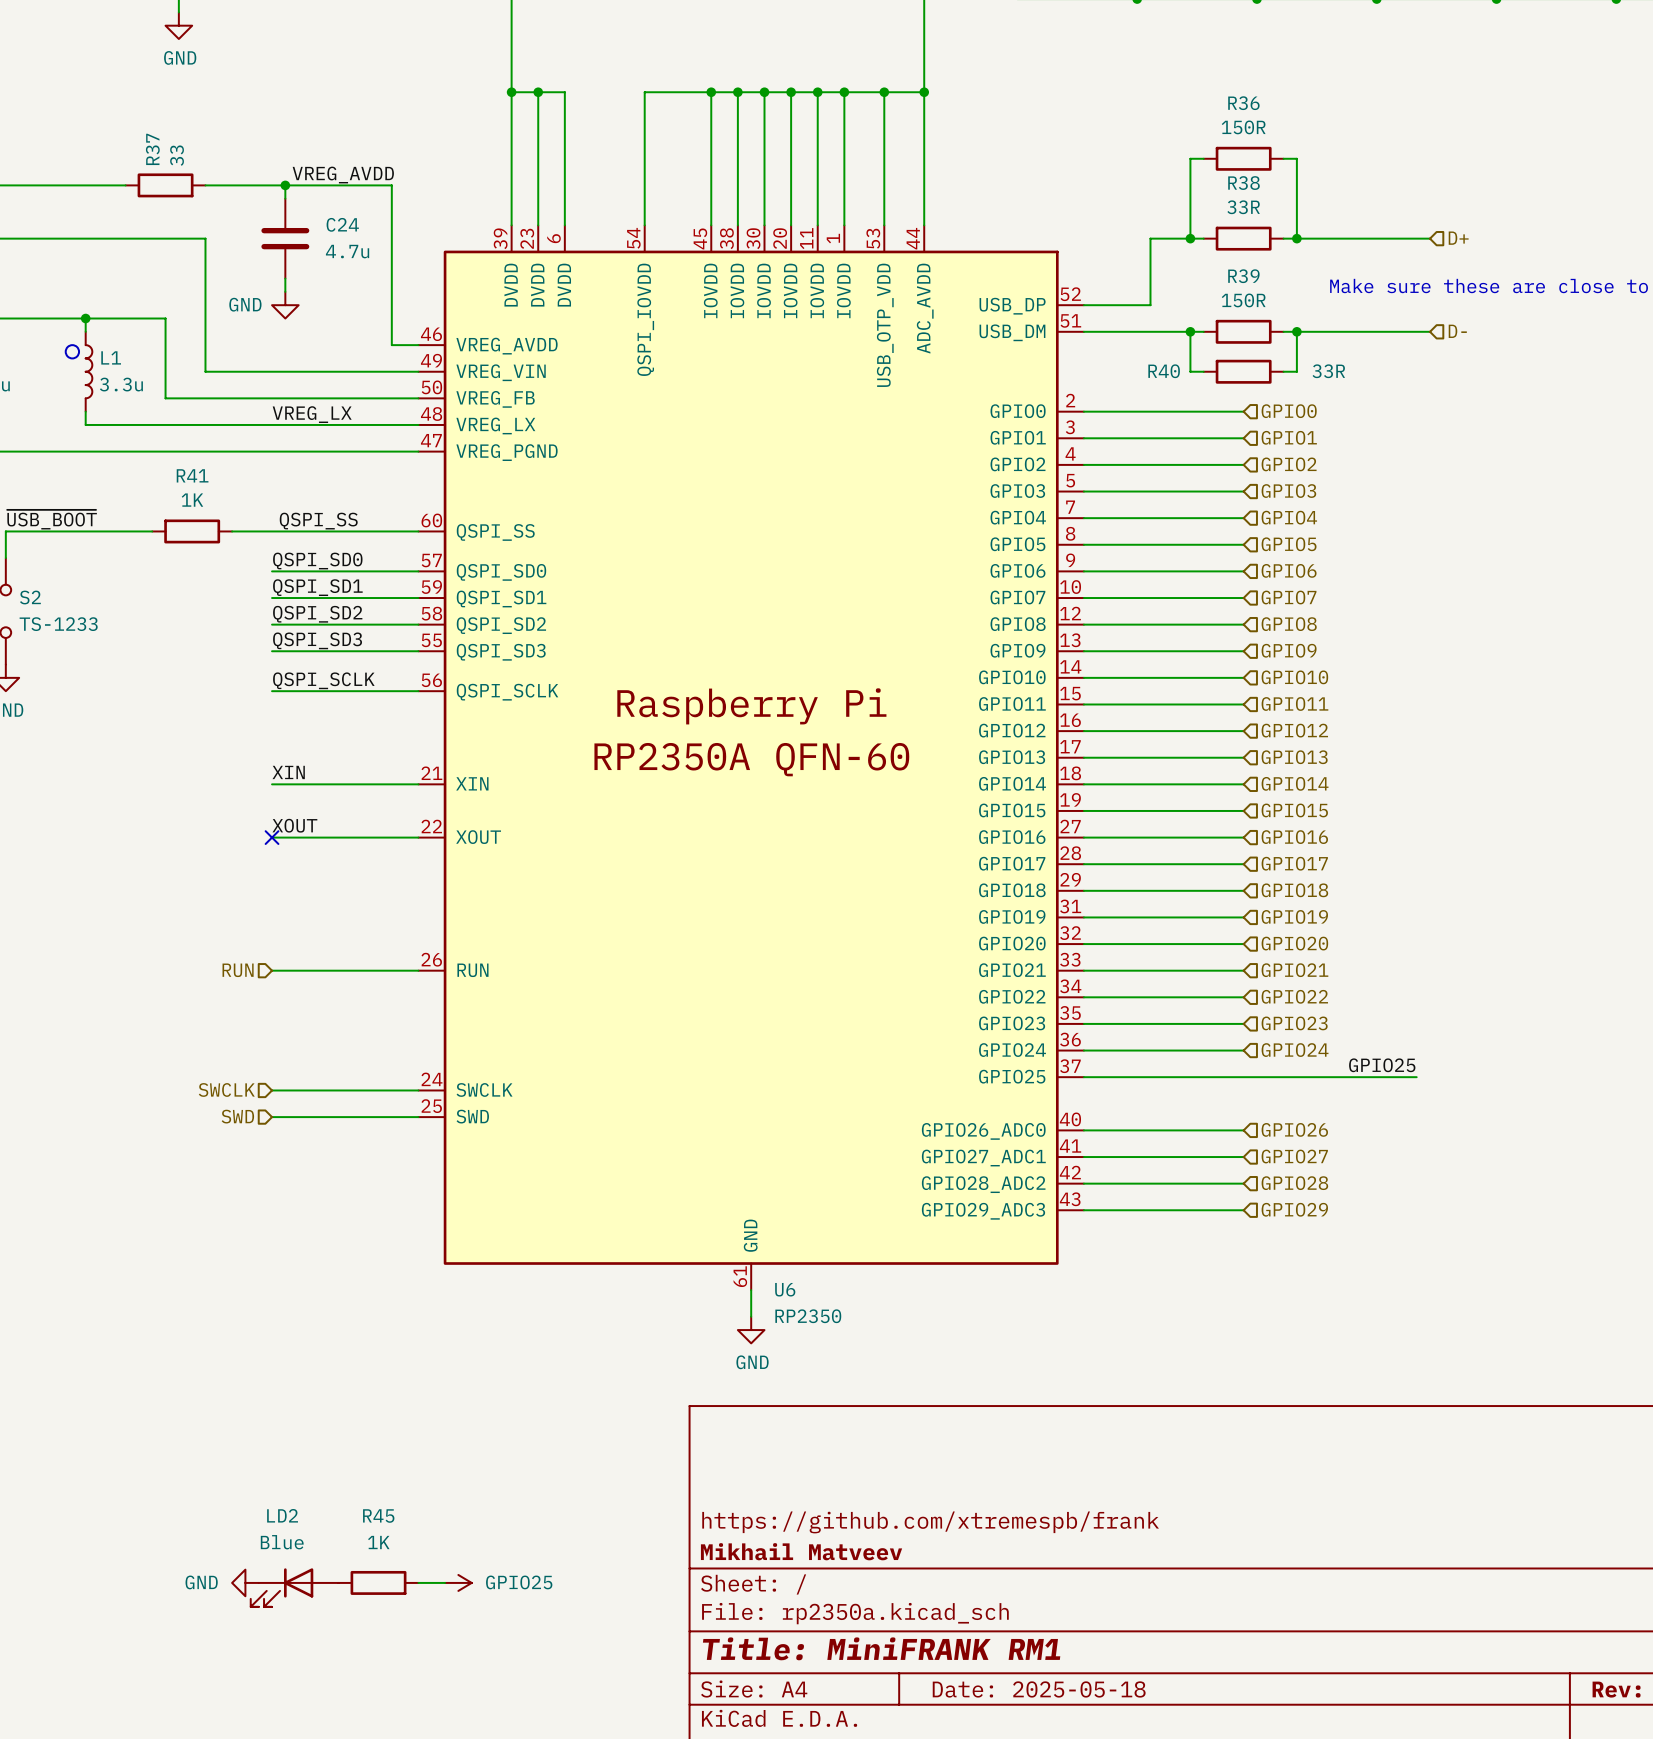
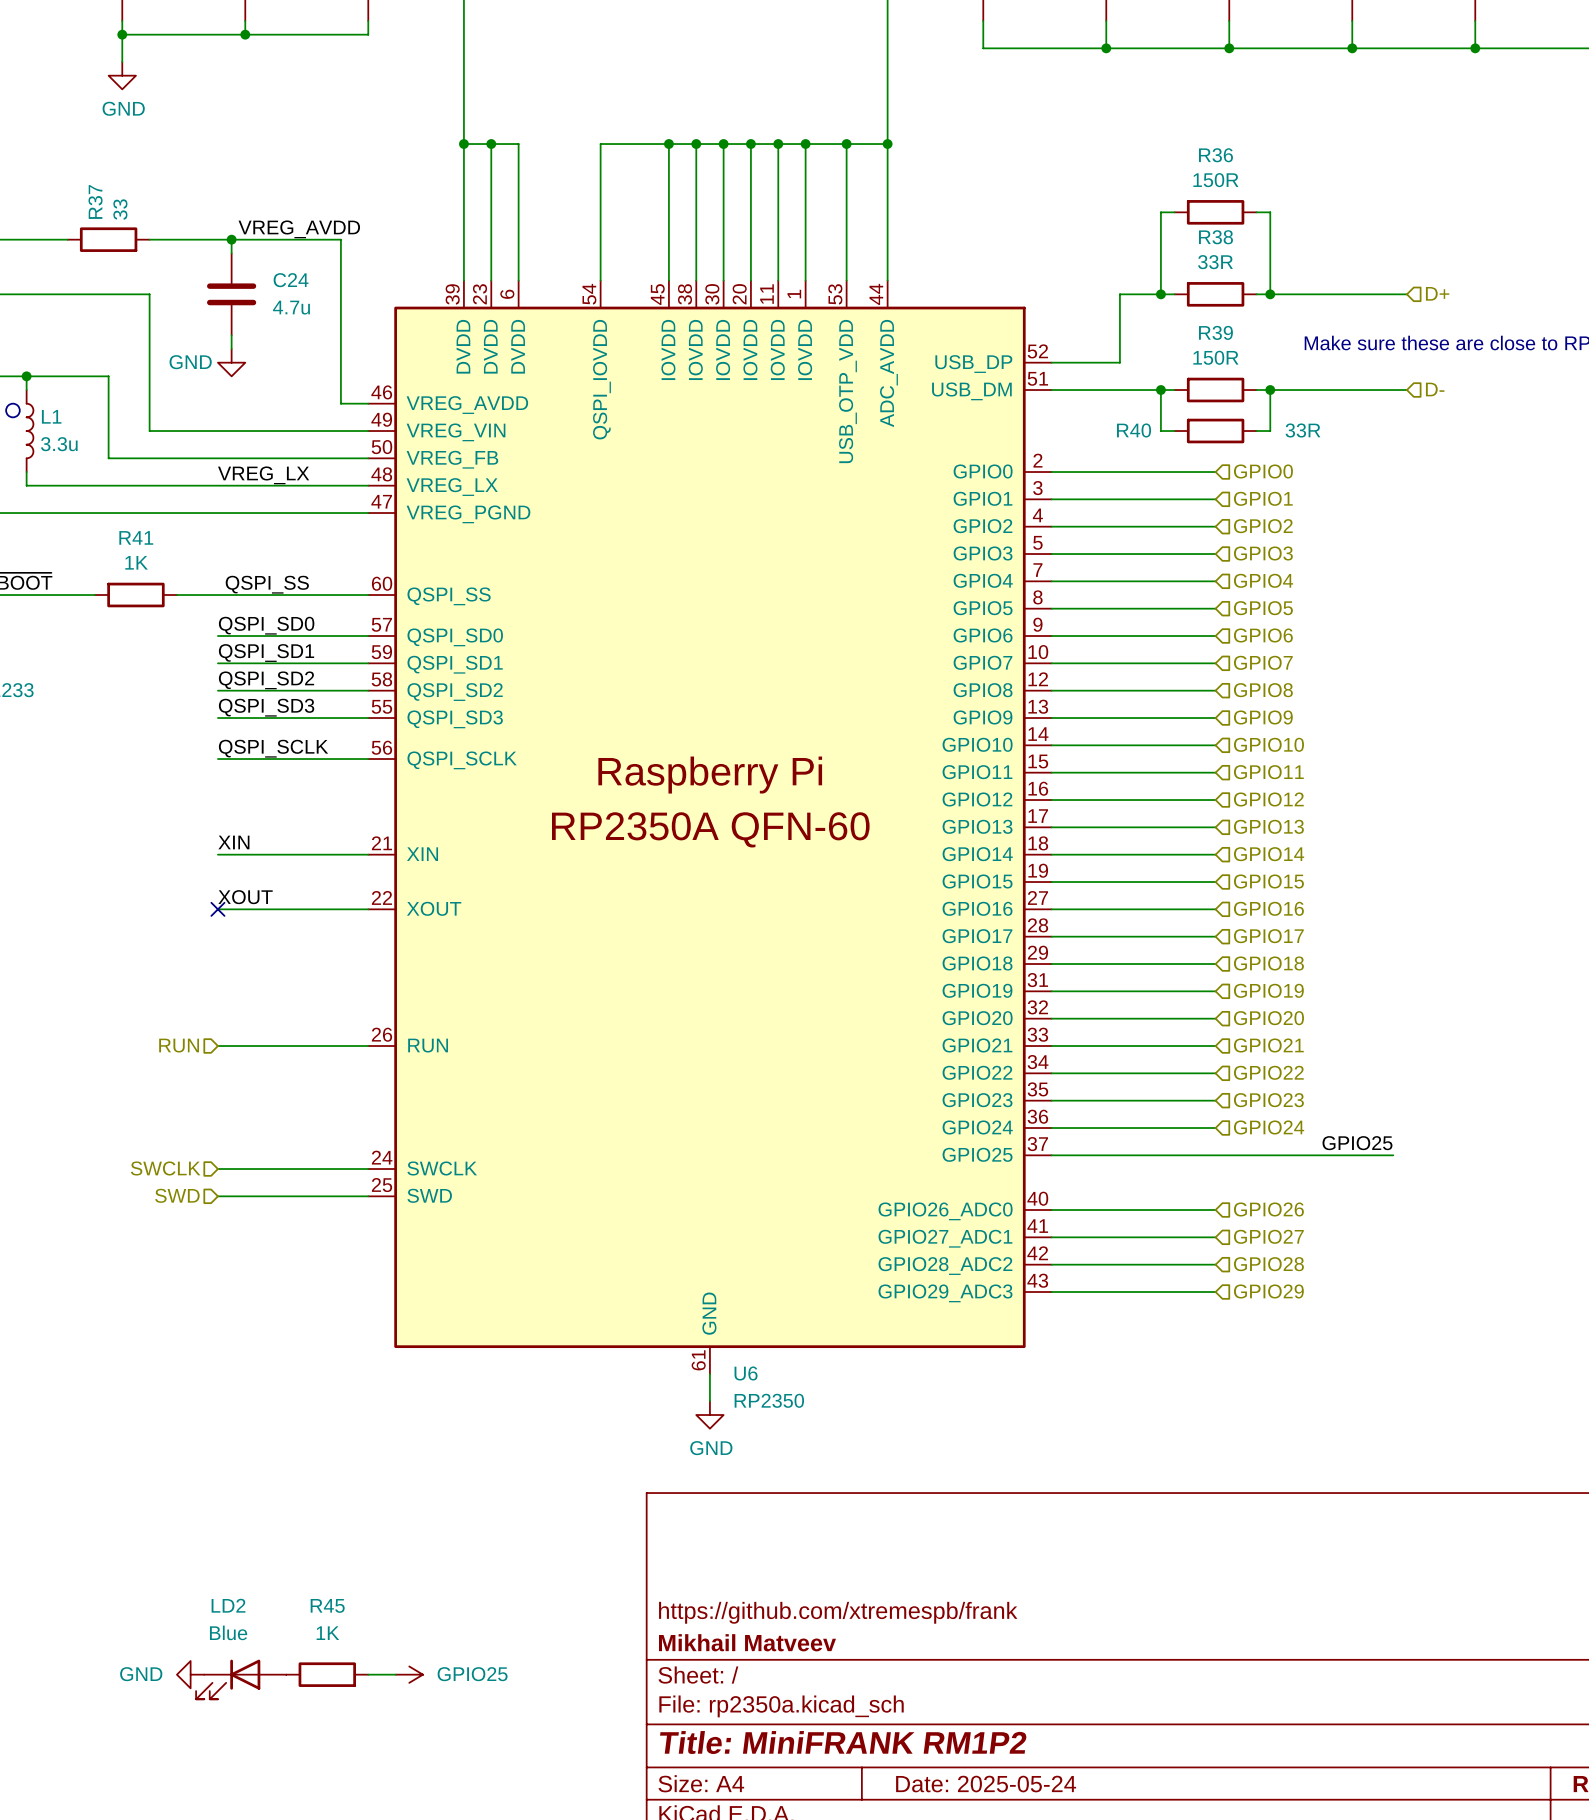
title block: Title: MiniFRANK RM1 (881, 1648) -> Title: MiniFRANK RM1P2 (843, 1742)
title block: Date: 2025-05-18 (1039, 1689) -> Date: 2025-05-24 (986, 1784)

